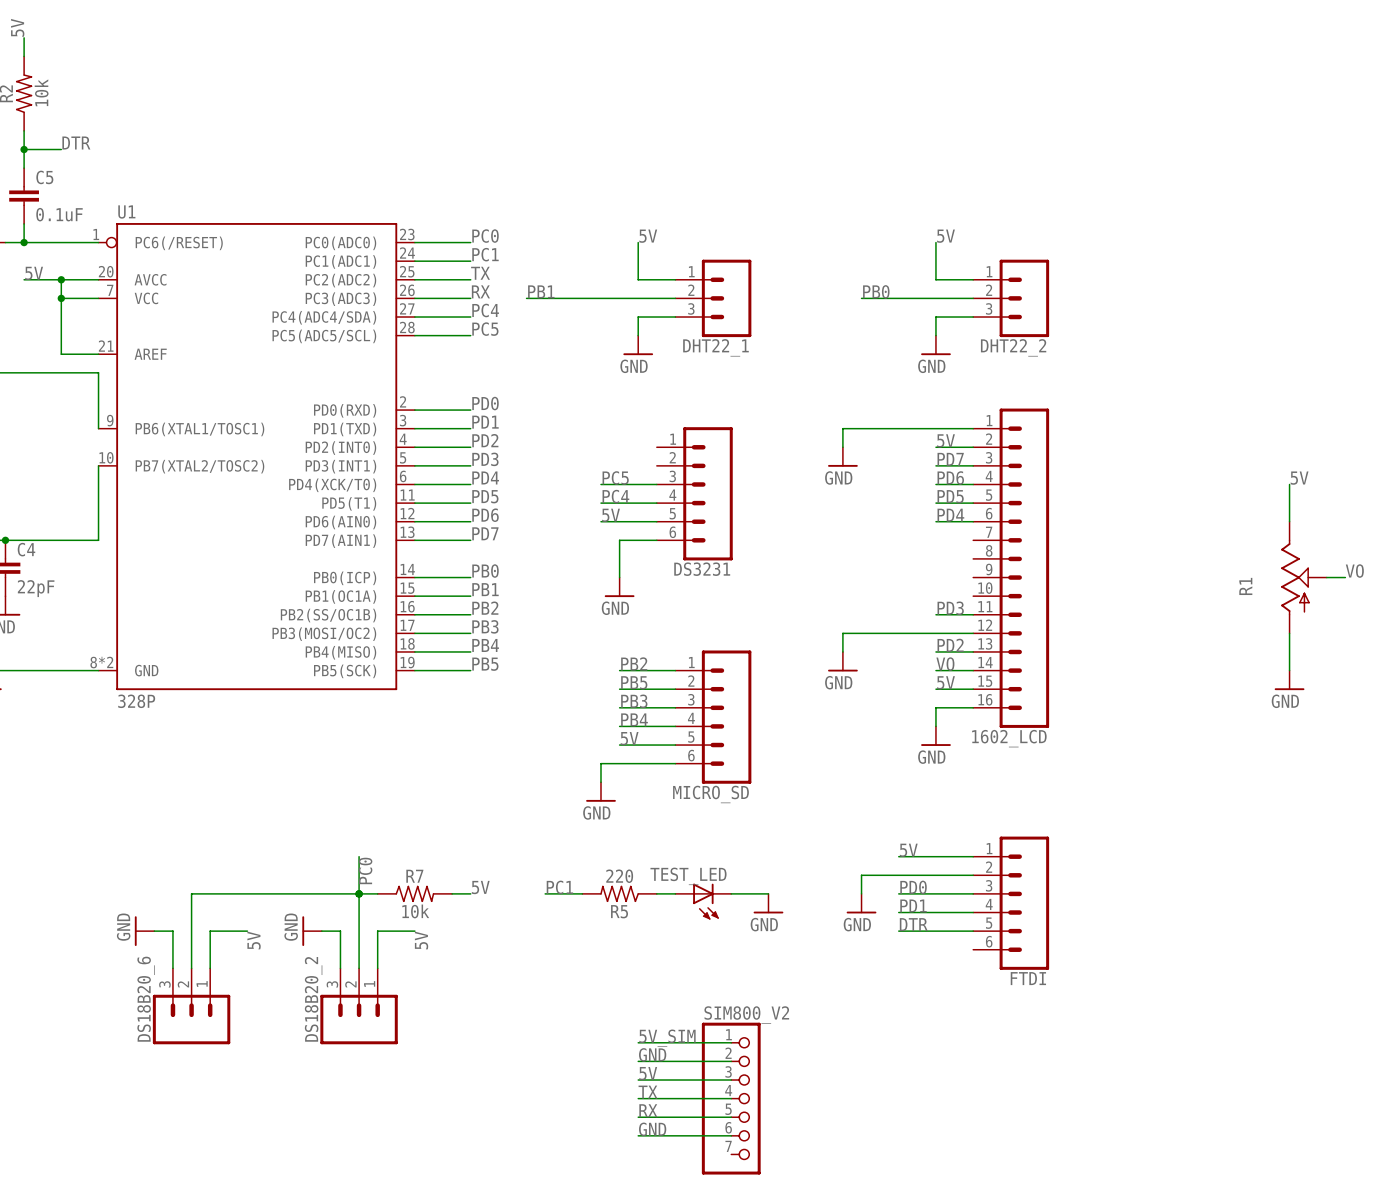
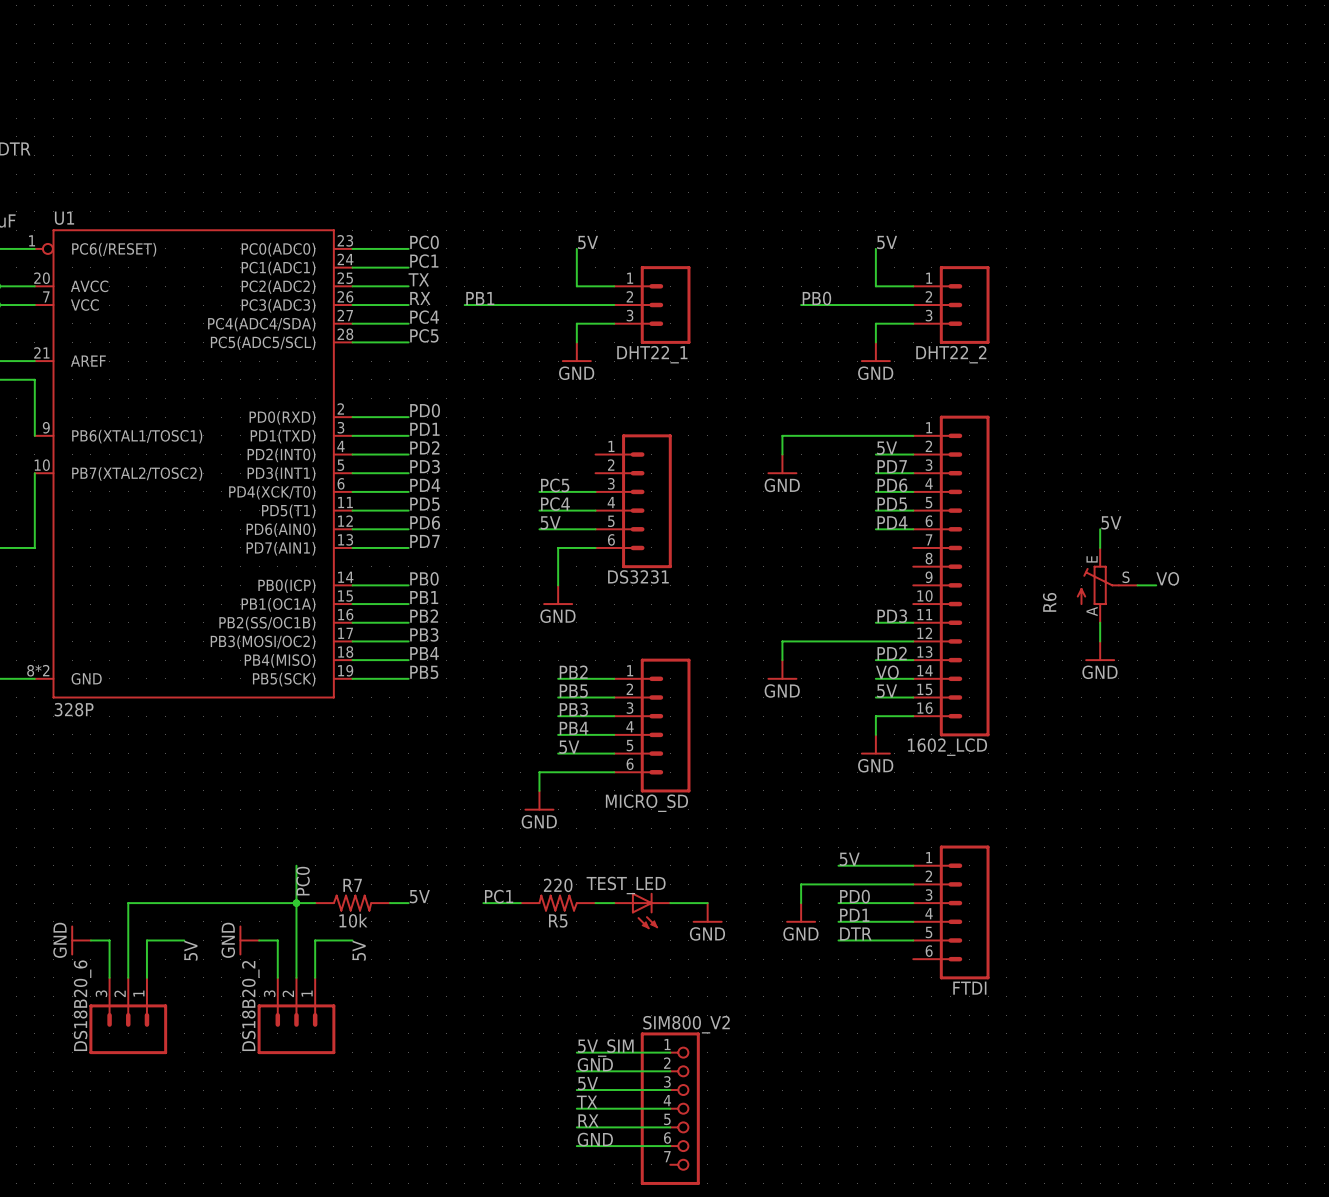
label position: 5V (1299, 478) -> 5V (1111, 522)
wire: (1289, 484) (1289, 521) -> none
wire: none -> (1100, 529) (1100, 547)
label position: VO (1354, 571) -> VO (1167, 578)
R6: none -> (1107, 585)
R1: (1303, 577) -> none
wire: (1326, 577) (1345, 577) -> (1137, 585) (1156, 585)
wire: none -> (1100, 622) (1100, 641)
wire: (1289, 633) (1289, 670) -> none
power symbol position: GND (1289, 680) -> GND (1100, 651)

